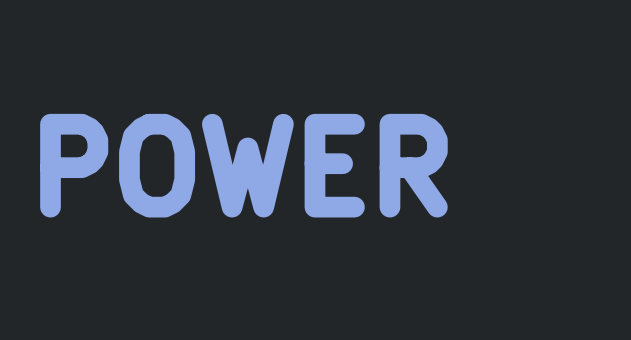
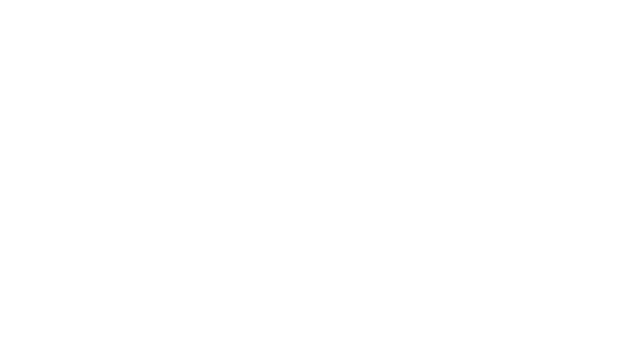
text: POWER (243, 165) -> none

